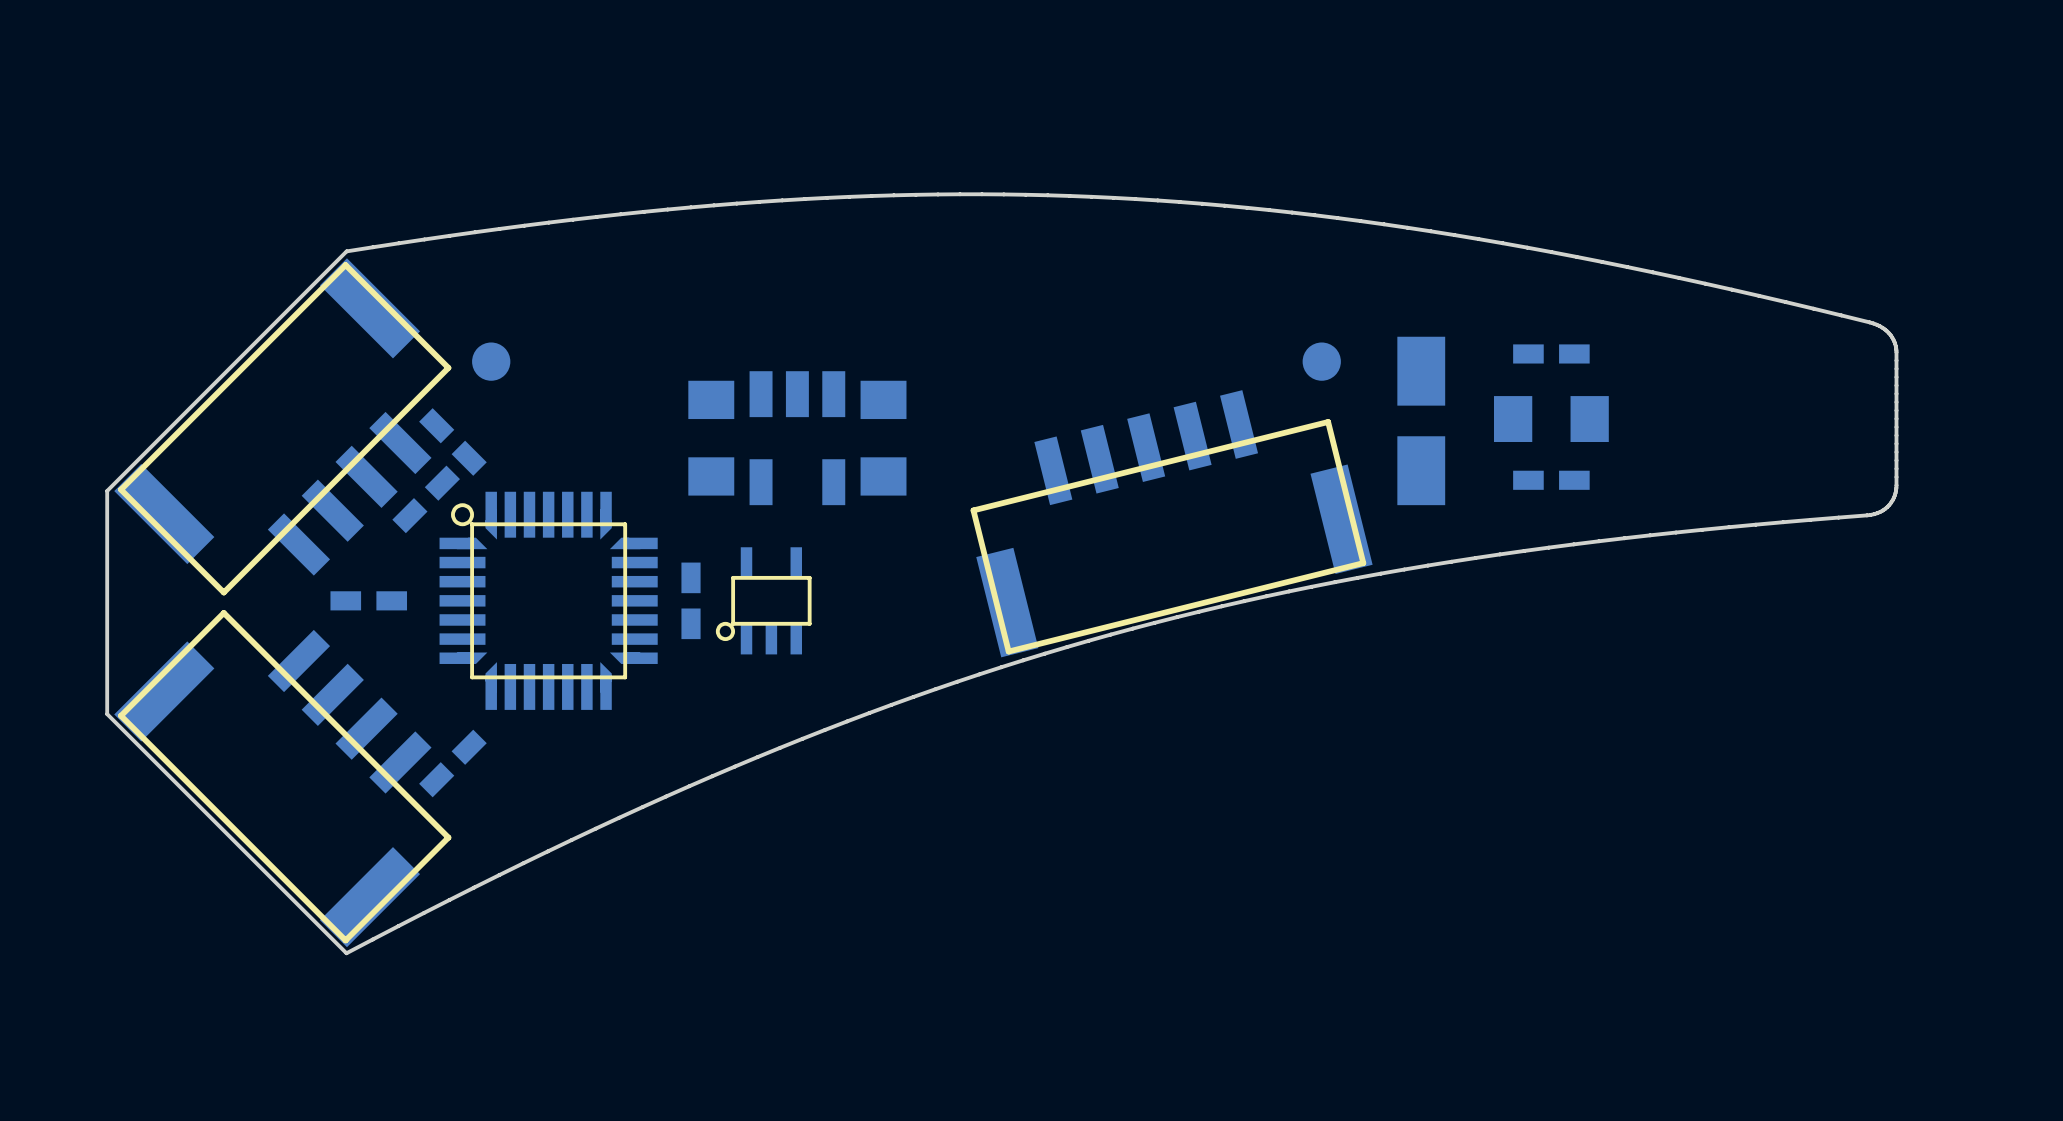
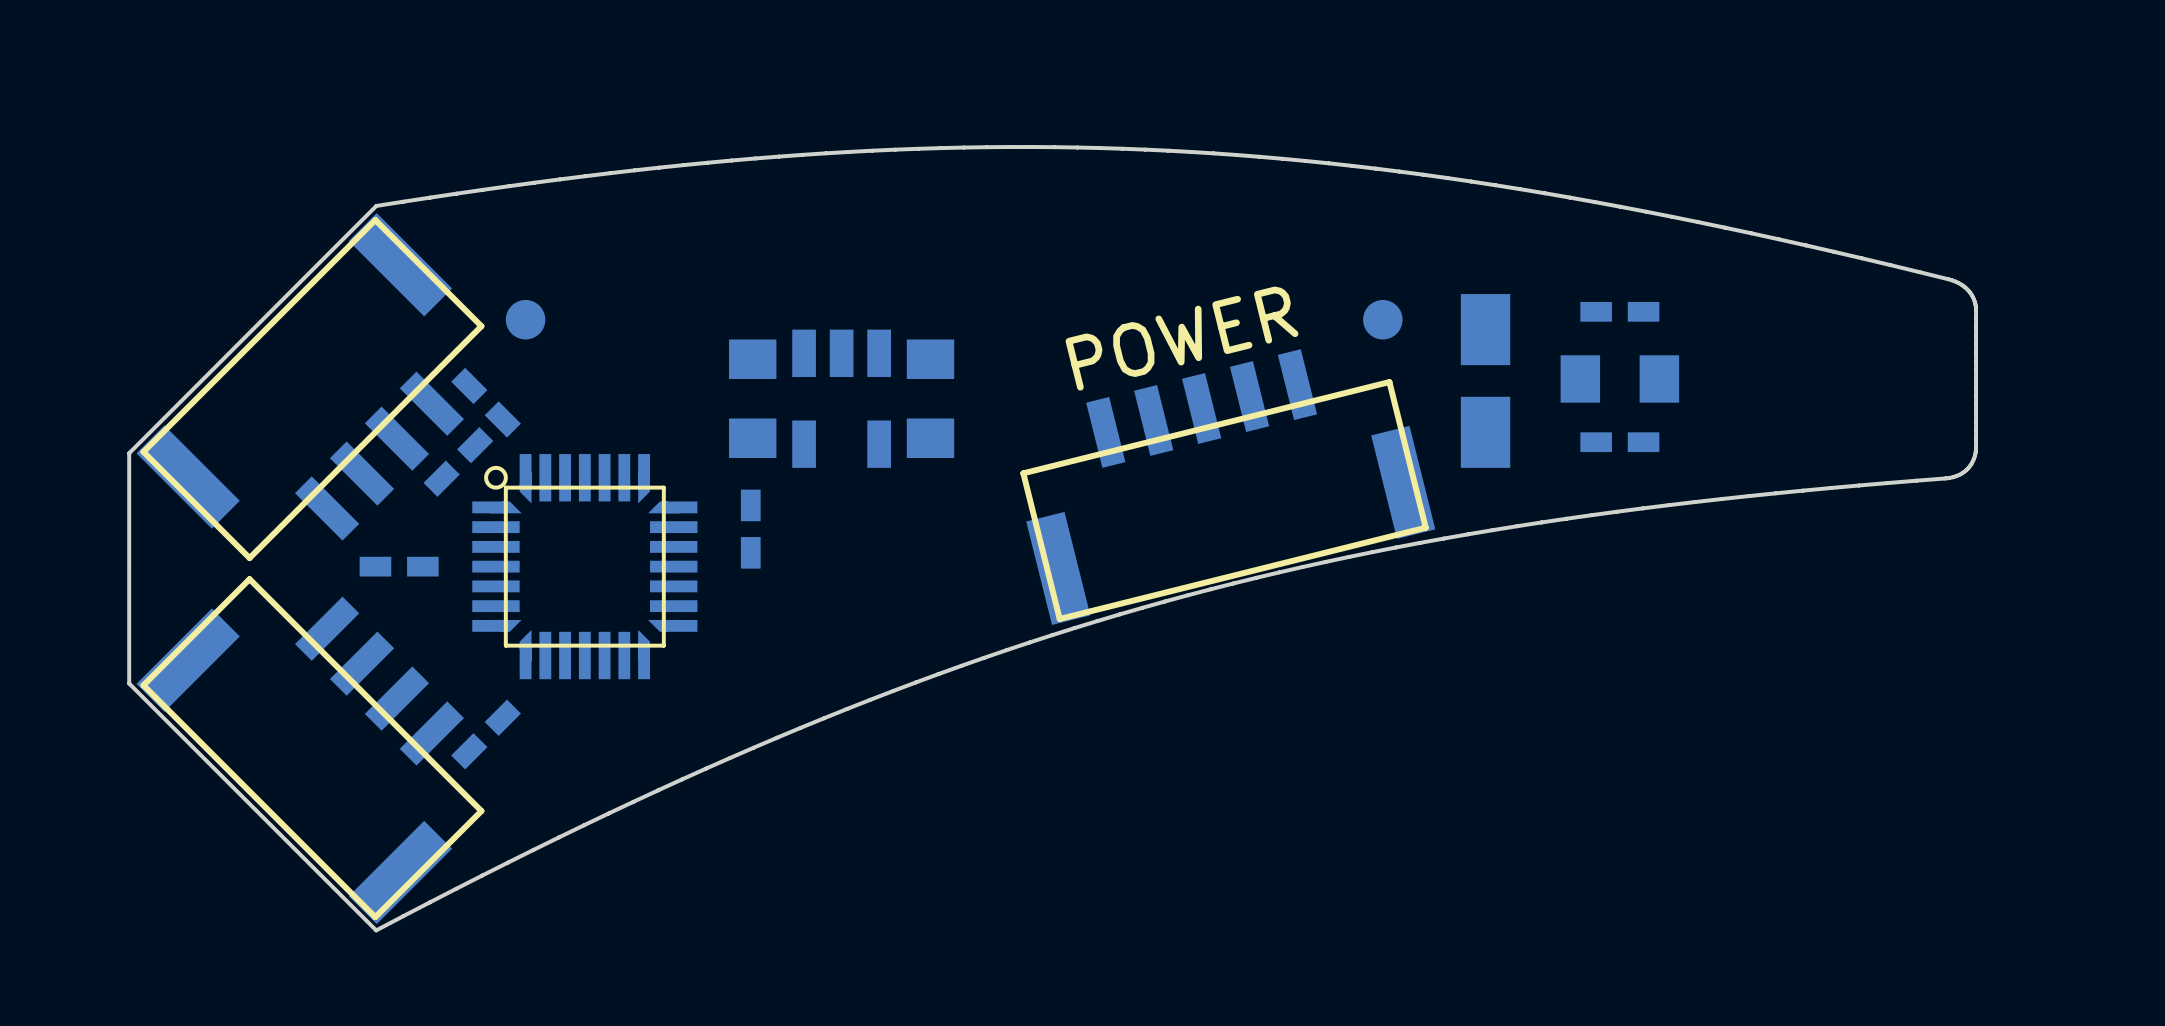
text: none -> POWER (1182, 338)
part position: (691, 600) -> (750, 529)
part: (763, 600) -> none

